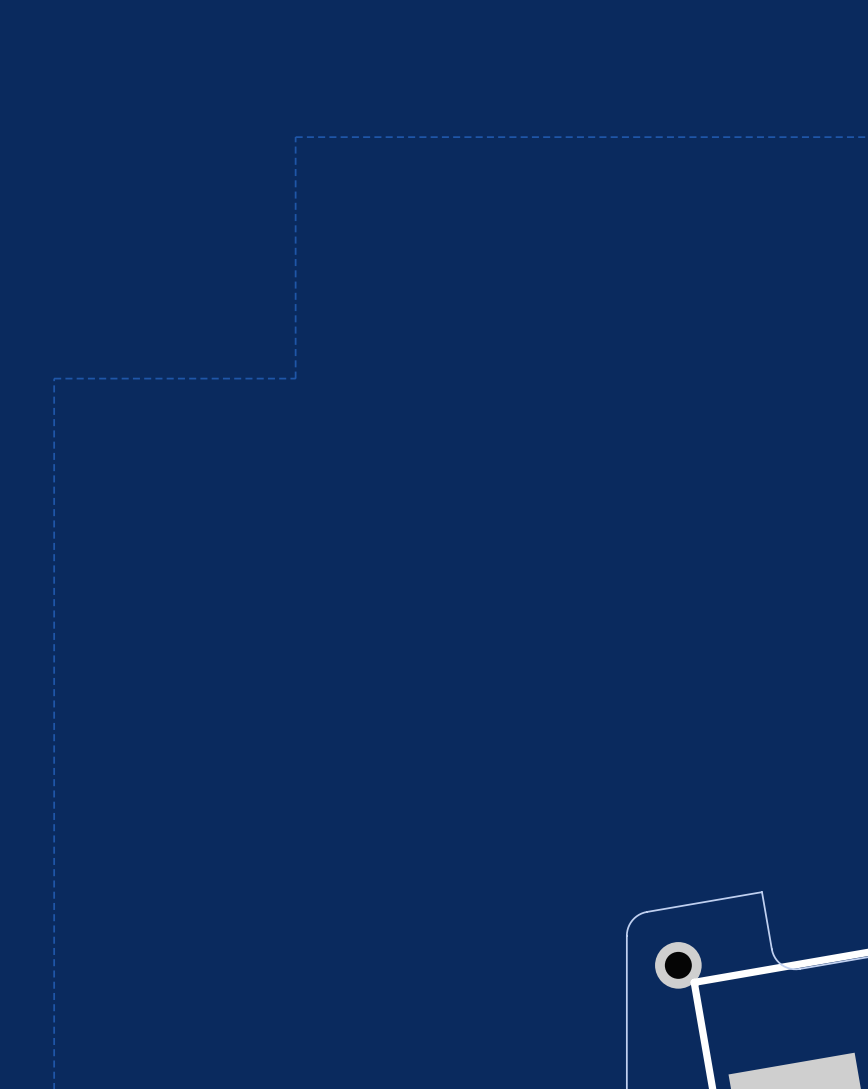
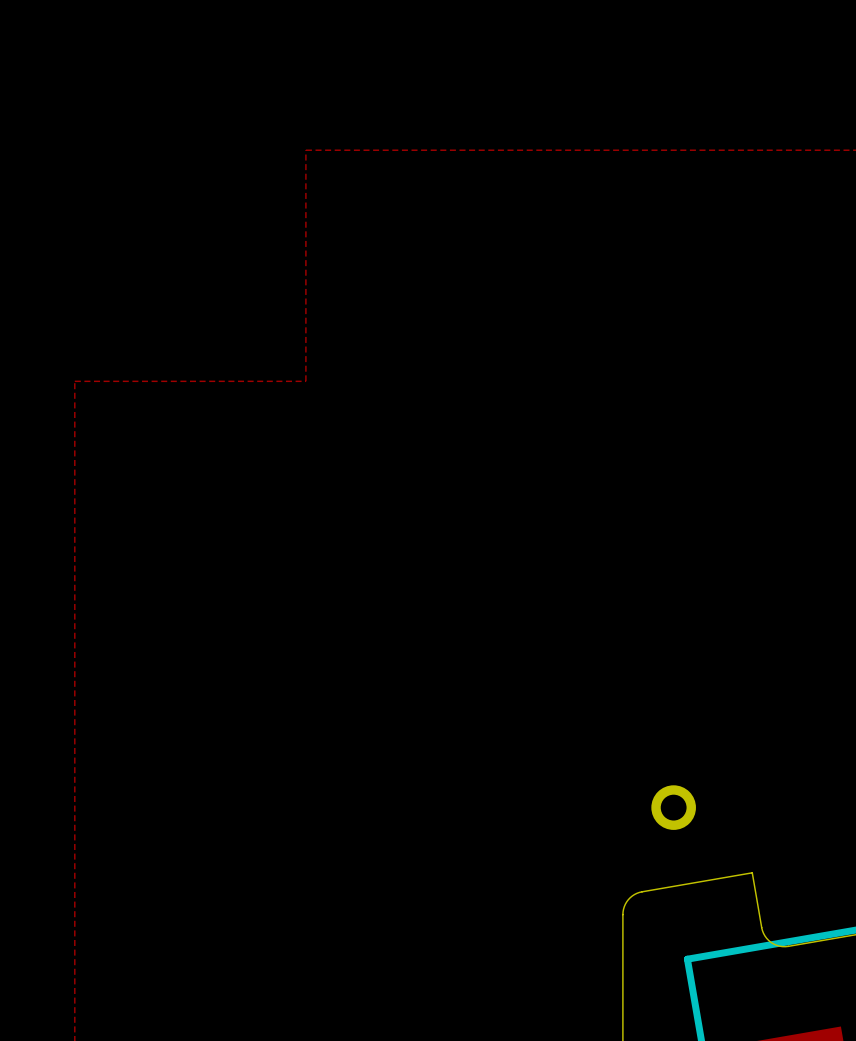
part position: (678, 965) -> (673, 807)

